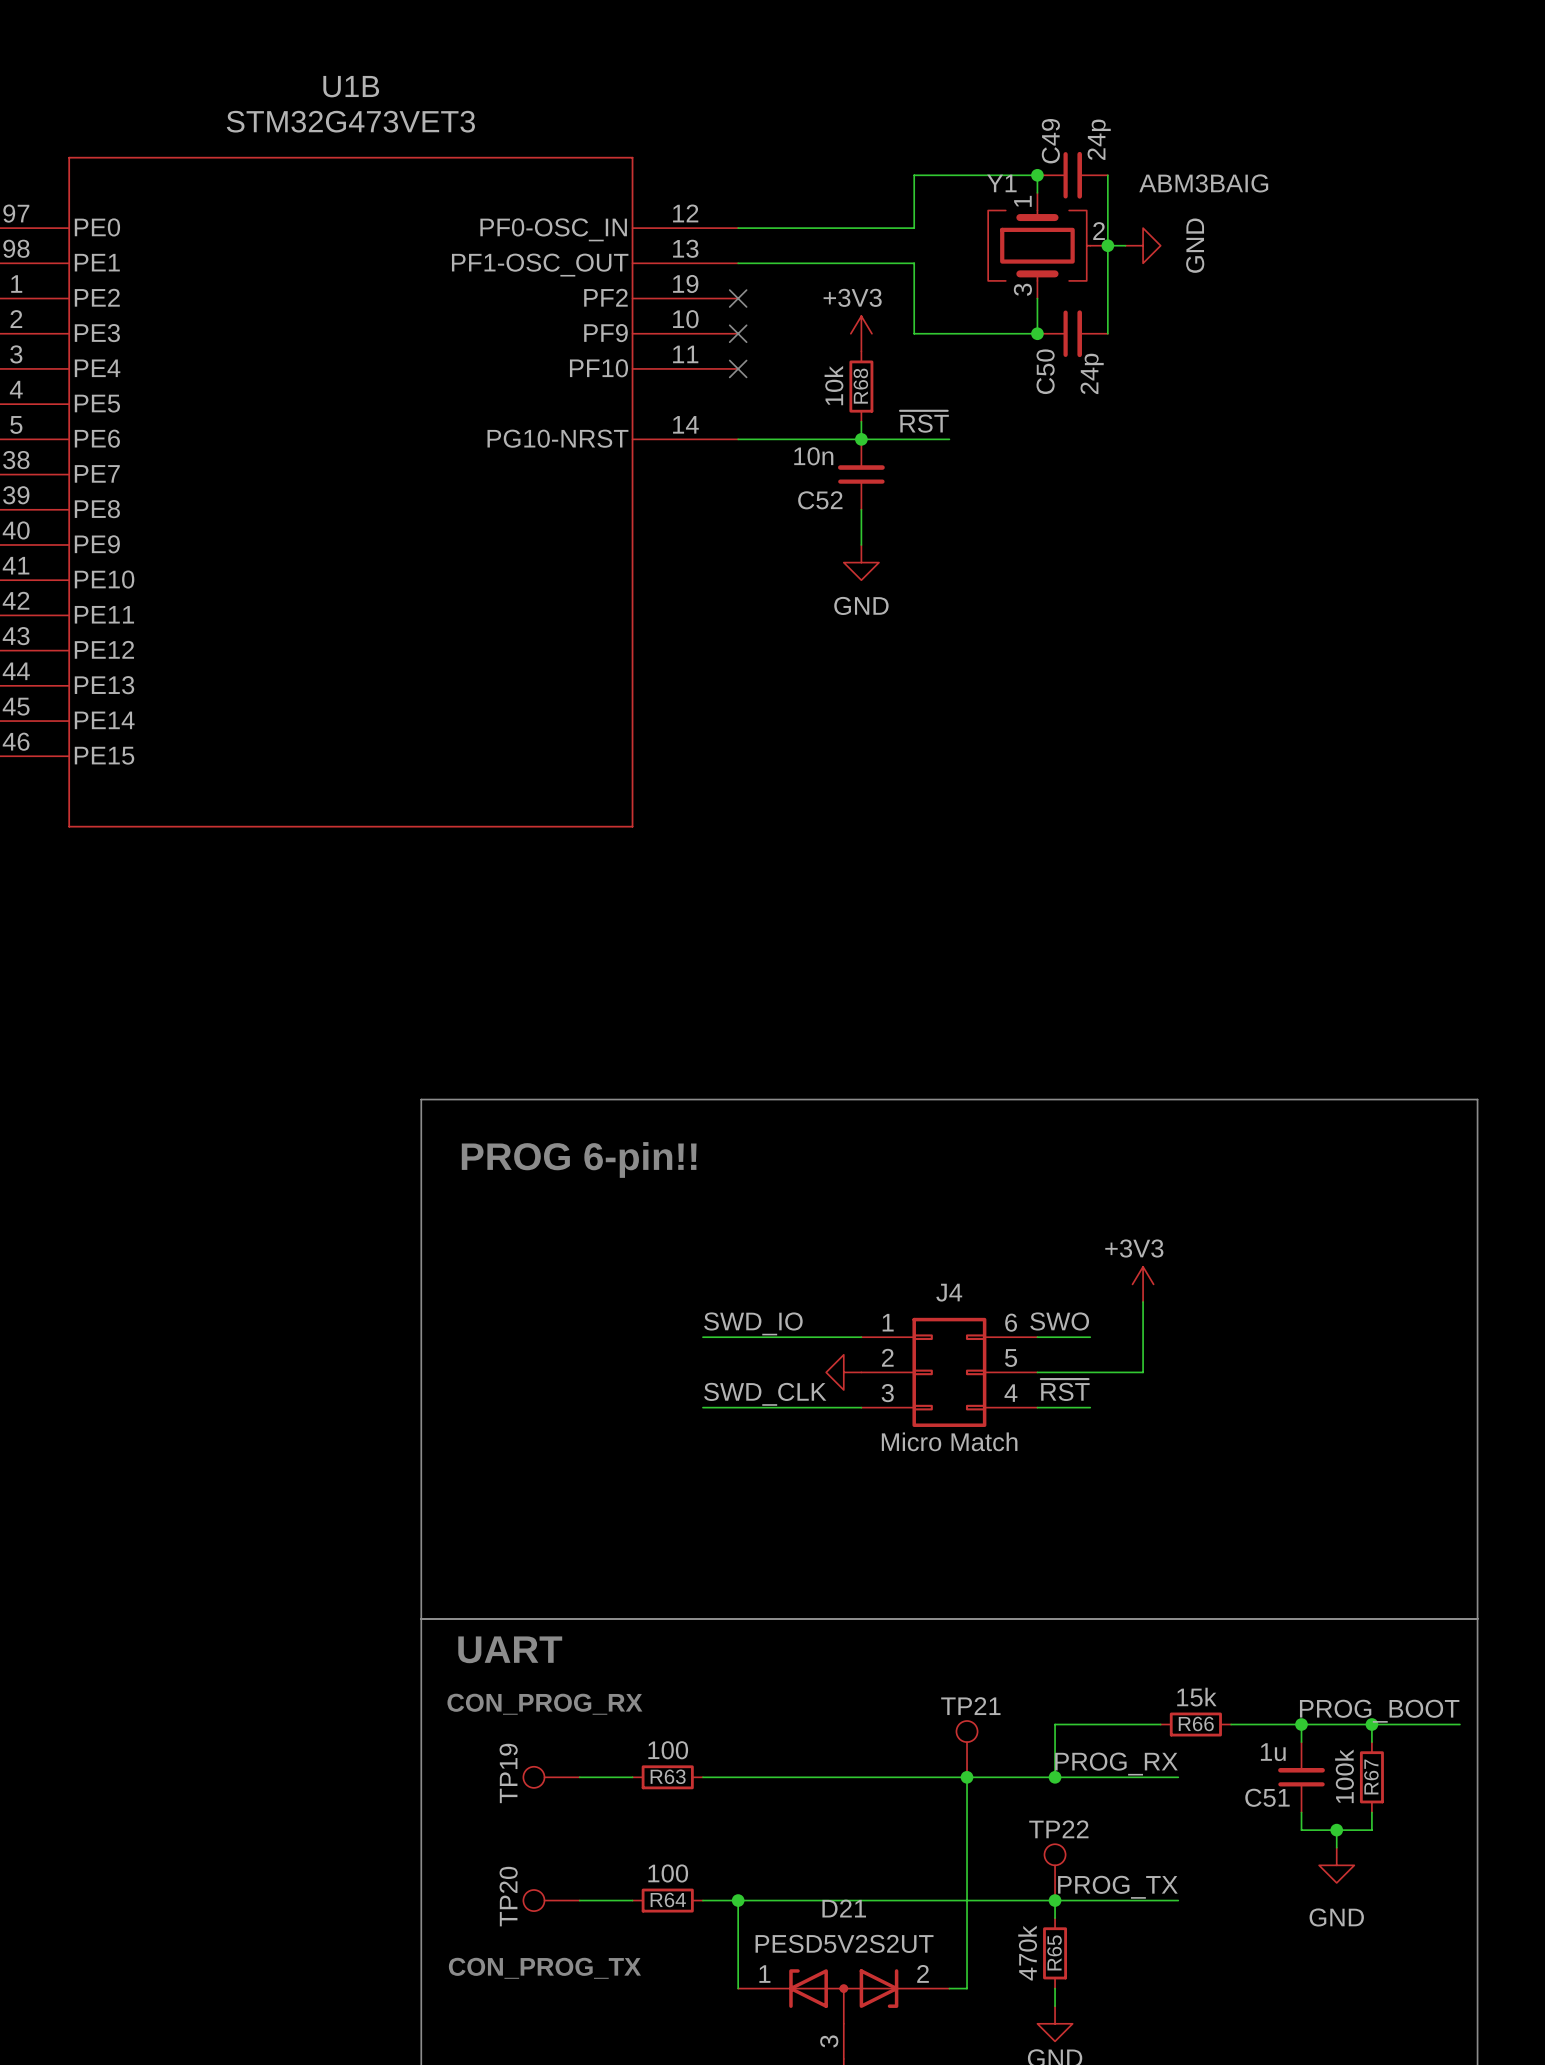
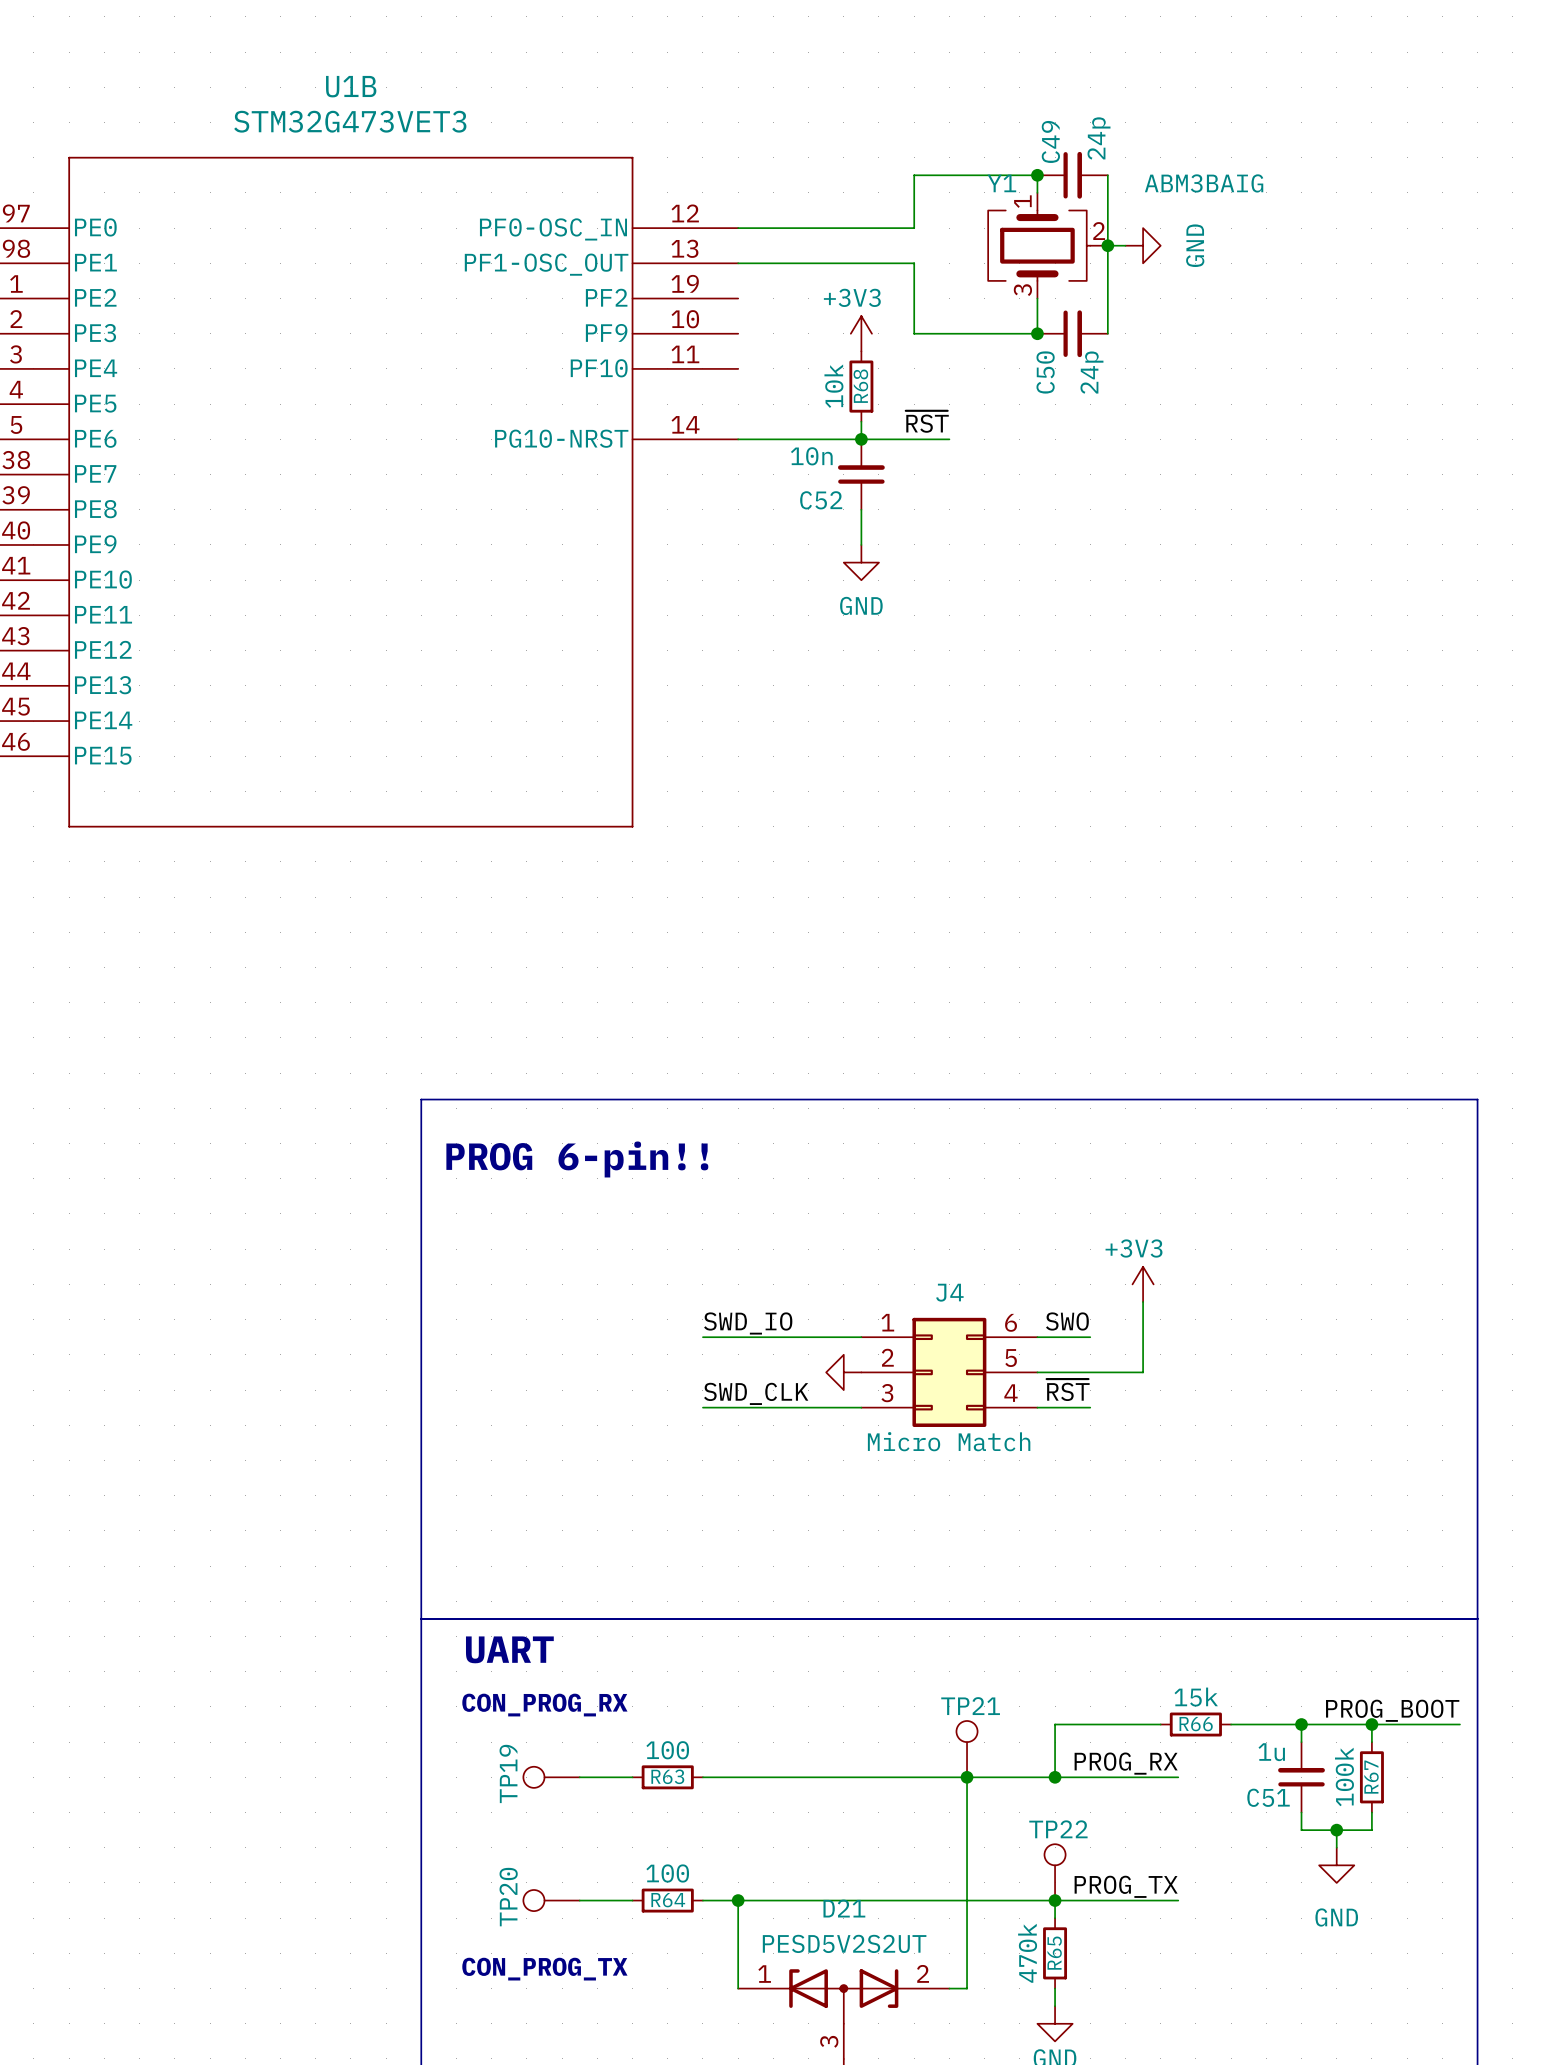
no-connect mark: (738, 298) -> none
no-connect mark: (738, 333) -> none
no-connect mark: (738, 368) -> none

